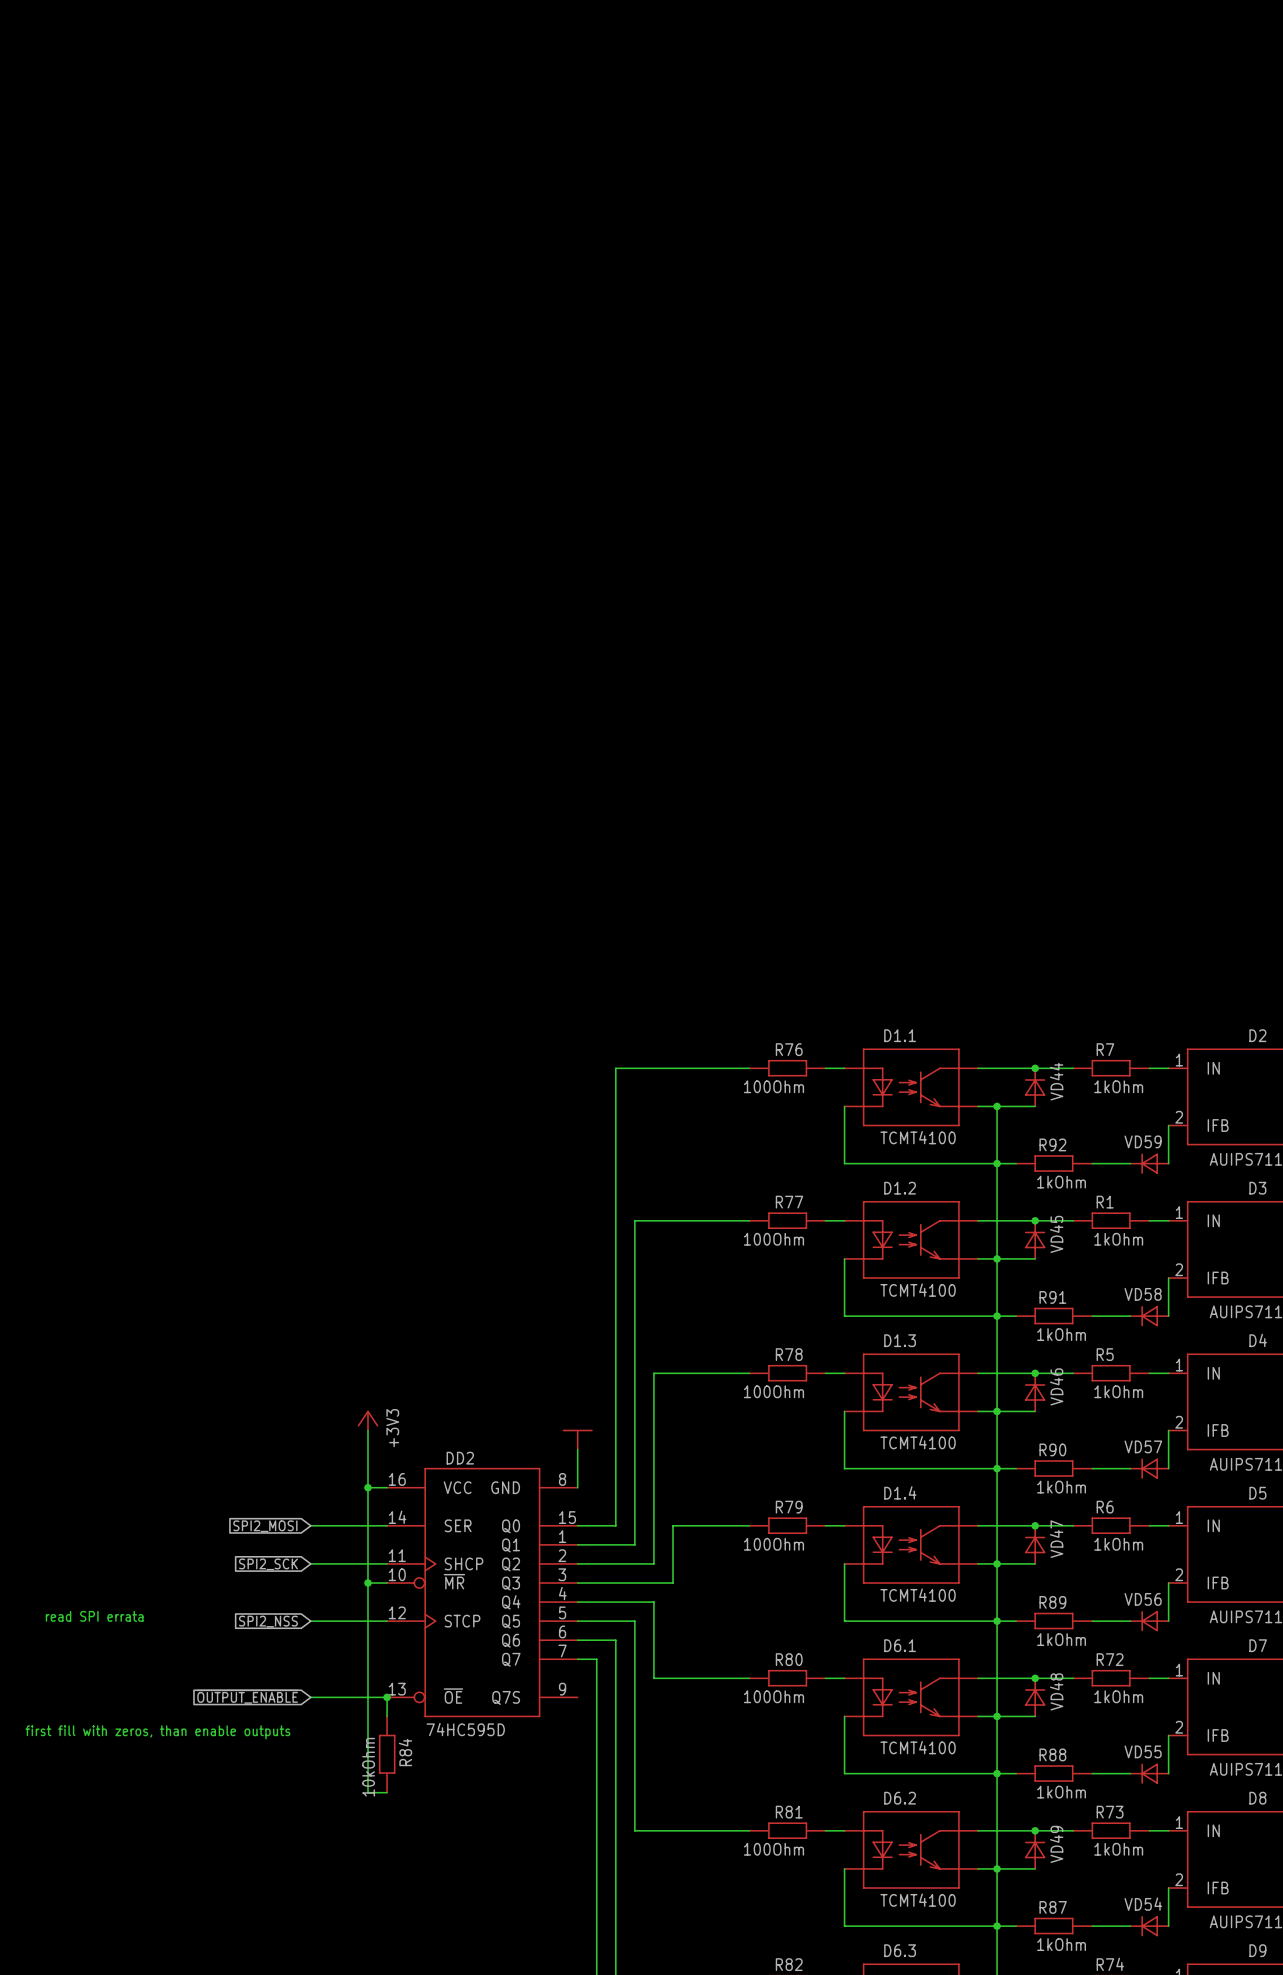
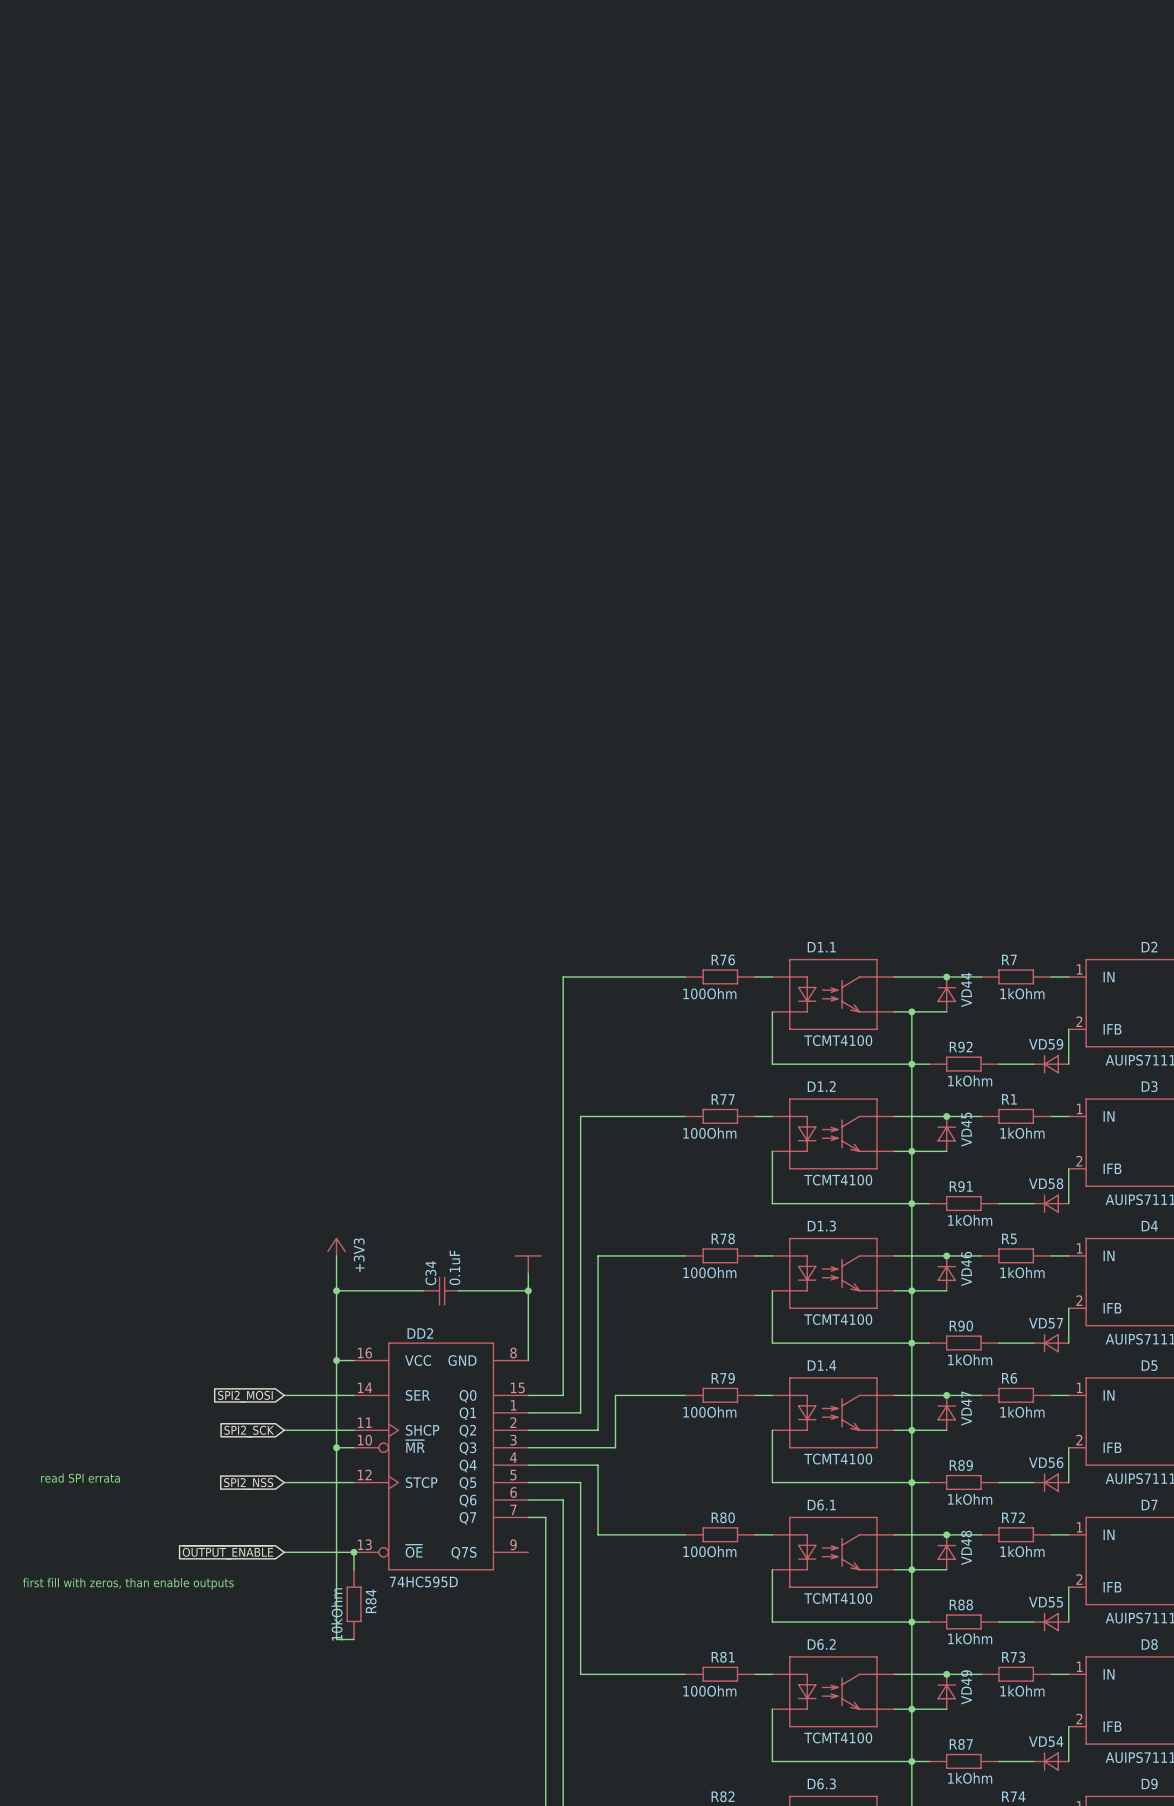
wire: none -> (336, 1255) (336, 1308)
wire: none -> (528, 1273) (528, 1325)
wire: none -> (336, 1290) (423, 1290)
junction: none -> (336, 1290)
C34: none -> 0.1uF (441, 1291)
wire: none -> (458, 1290) (528, 1290)
junction: none -> (528, 1290)
power symbol position: +3V3 (367, 1420) -> +3V3 (336, 1246)
power symbol position: (577, 1439) -> (528, 1264)

